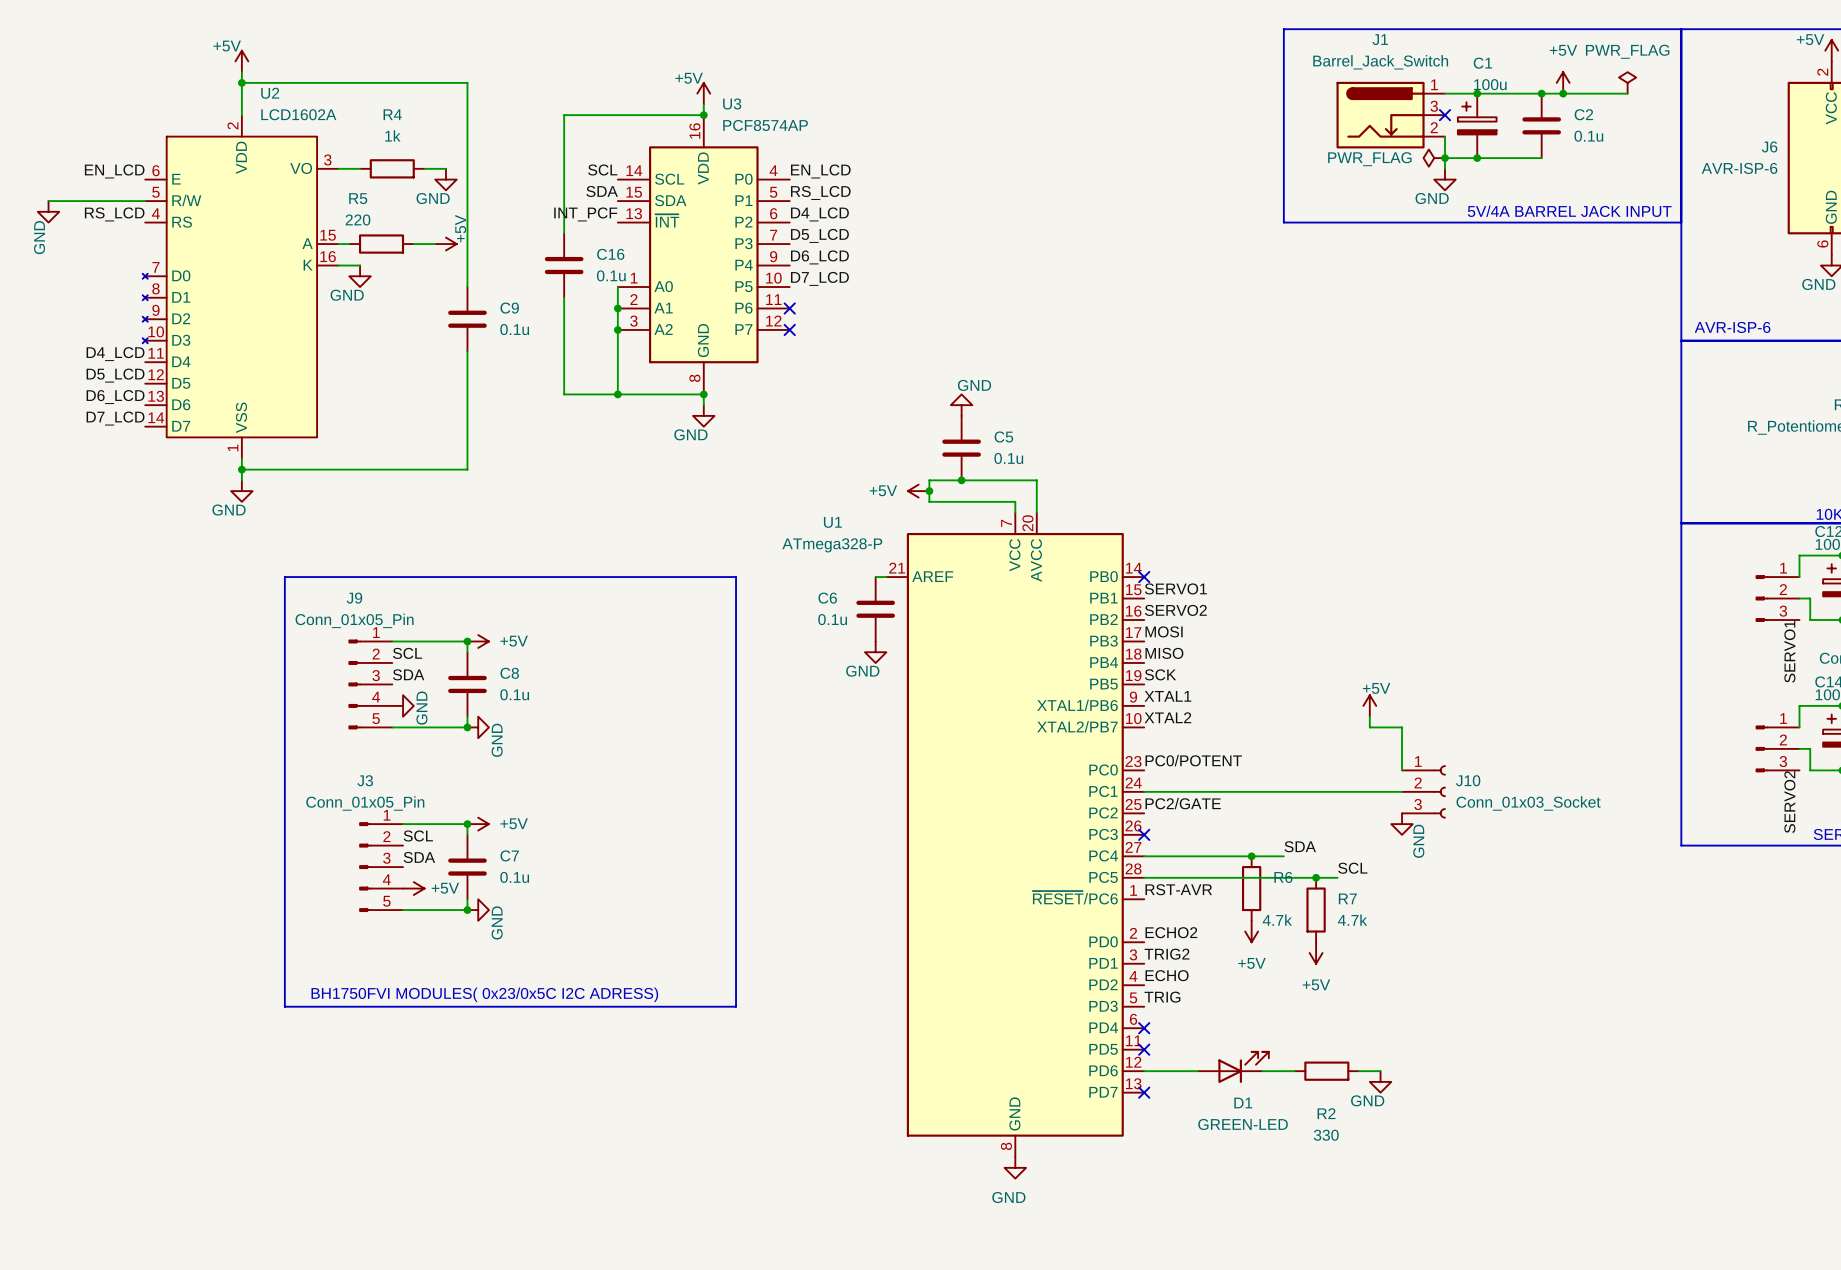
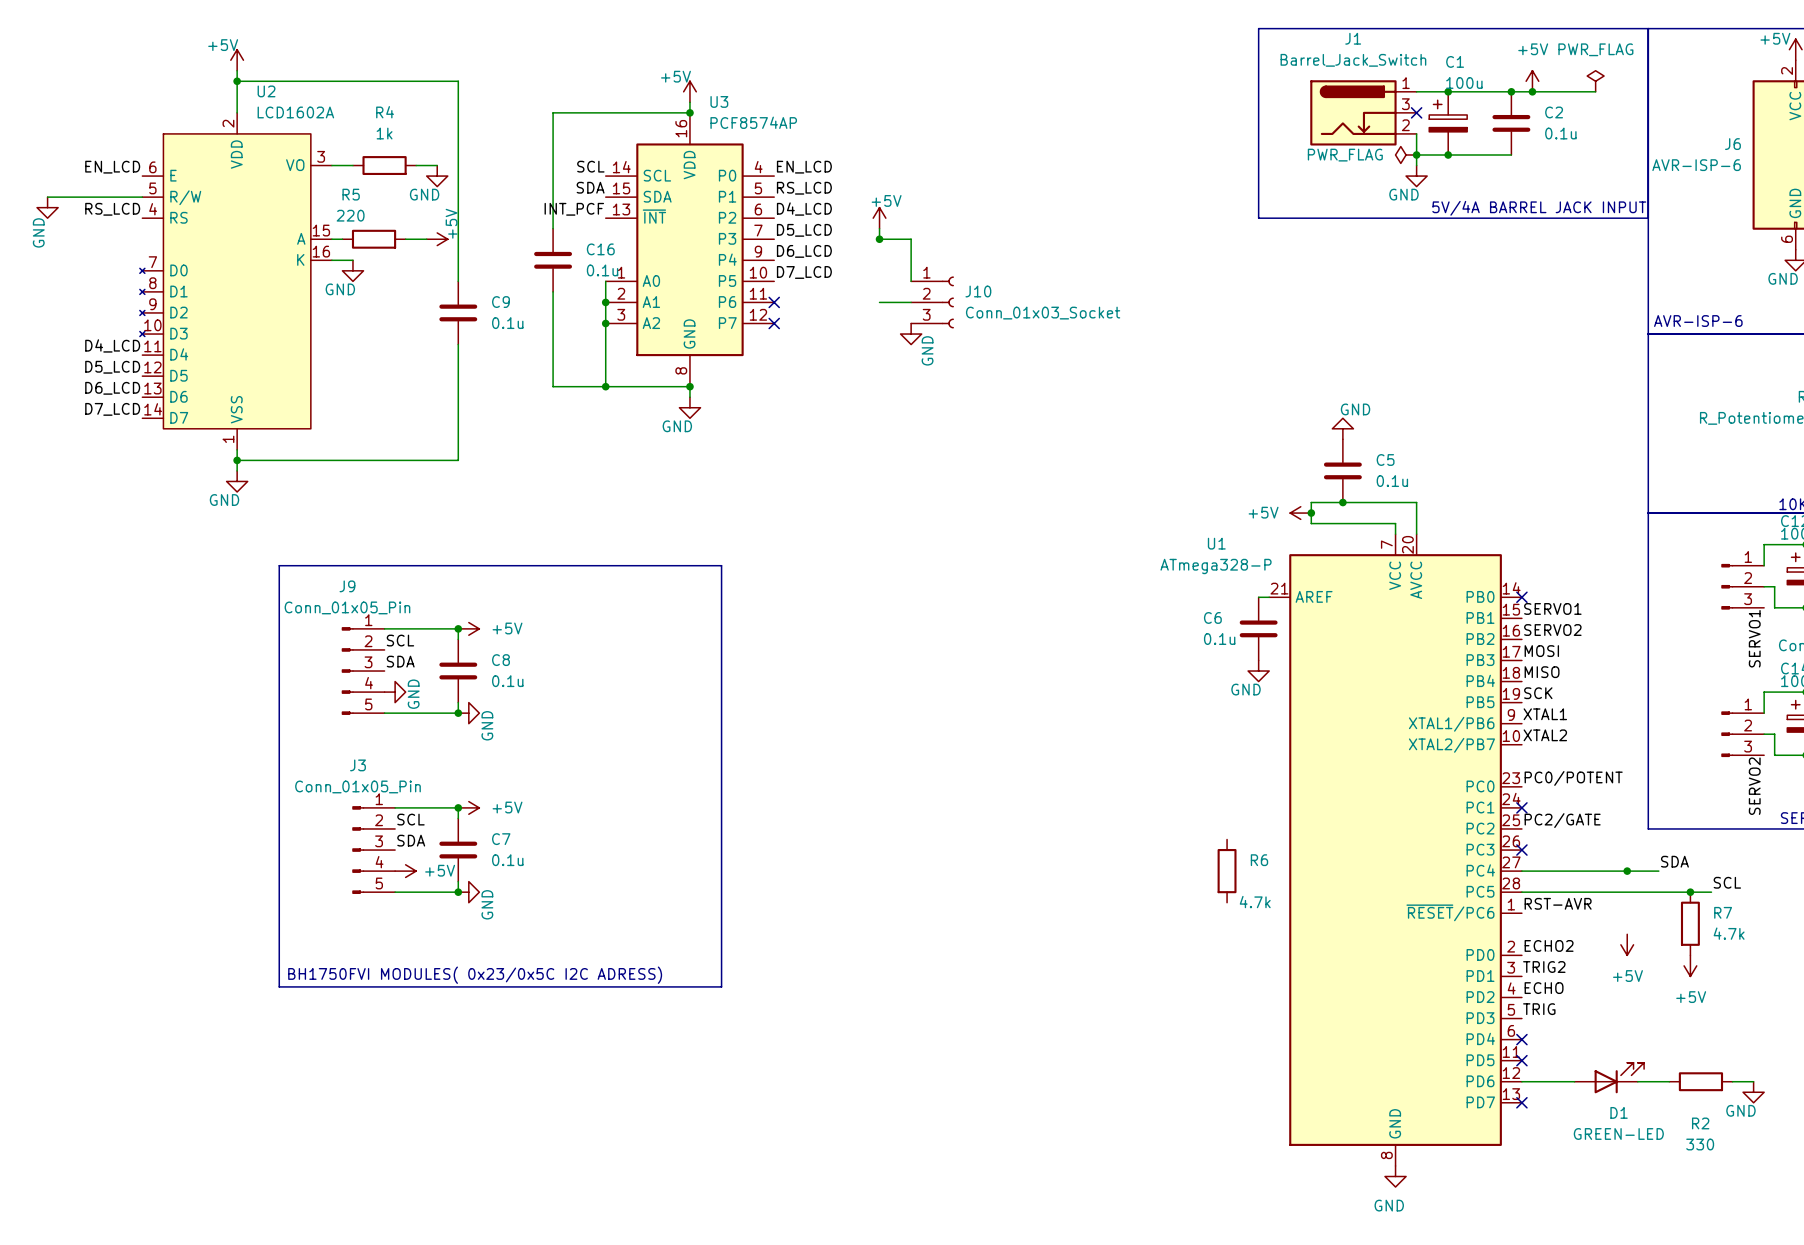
power symbol: none -> +5V (879, 218)
wire: none -> (879, 228) (879, 239) (911, 239) (911, 281)
junction: none -> (879, 239)
wire: none -> (879, 302) (911, 302)
power symbol text position: GND (974, 385) -> GND (927, 350)
power symbol rotation: 0° (961, 405) -> 180° (911, 334)
power symbol position: GND (961, 405) -> GND (911, 334)
power symbol: none -> GND (1342, 428)
C5 position: (961, 448) -> (1342, 470)
junction: (961, 480) -> none
power symbol: +5V (918, 491) -> none
junction: (929, 491) -> none
wire: (1015, 512) (1015, 501) (929, 501) (929, 480) (1036, 480) (1036, 512) -> none
junction: none -> (1342, 502)
junction: none -> (1311, 513)
wire: none -> (1395, 534) (1395, 523) (1311, 523) (1311, 502) (1416, 502) (1416, 534)
wire: (875, 577) (886, 577) -> none
no-connect mark: (1144, 577) -> none
label: SERVO1 (1175, 588) -> none
C6 position: (875, 609) -> (1258, 628)
wire: none -> (1258, 597) (1269, 597)
no-connect mark: none -> (1521, 597)
label: SERVO2 (1175, 610) -> none
label: none -> SERVO1 (1552, 608)
label: MOSI (1164, 631) -> none
label: none -> SERVO2 (1552, 630)
power symbol: GND (875, 652) -> none
label: MISO (1164, 653) -> none
label: none -> MOSI (1541, 651)
label: SCK (1160, 674) -> none
label: none -> MISO (1542, 672)
power symbol text position: +5V (1376, 688) -> +5V (1263, 512)
label: XTAL1 (1167, 696) -> none
power symbol rotation: 0° (1369, 705) -> 90° counterclockwise (1300, 513)
power symbol position: +5V (1369, 705) -> +5V (1300, 513)
label: none -> SCK (1538, 693)
label: XTAL2 (1167, 717) -> none
label: none -> XTAL1 (1545, 714)
label: none -> XTAL2 (1545, 735)
label: PC0/POTENT (1193, 760) -> none
wire: (1144, 791) (1402, 791) -> none
J10 position: (1423, 791) -> (932, 302)
label: none -> PC0/POTENT (1573, 778)
label: PC2/GATE (1183, 803) -> none
power symbol position: GND (1402, 824) -> GND (1258, 671)
no-connect mark: none -> (1521, 807)
U1 position: (1015, 834) -> (1395, 850)
no-connect mark: (1144, 834) -> none
label: none -> PC2/GATE (1562, 820)
power symbol text rotation: 0° (1418, 841) -> 90° clockwise (1246, 689)
label: SDA (1300, 846) -> none
wire: (1144, 856) (1283, 856) -> none
junction: (1251, 856) -> none
no-connect mark: none -> (1521, 850)
label: SCL (1352, 868) -> none
wire: (1144, 877) (1337, 877) -> none
junction: (1316, 877) -> none
label: none -> SDA (1674, 861)
wire: none -> (1521, 871) (1658, 871)
junction: none -> (1627, 871)
label: RST-AVR (1178, 889) -> none
label: none -> SCL (1727, 882)
R7 position: (1316, 910) -> (1690, 923)
wire: none -> (1521, 892) (1711, 892)
junction: none -> (1690, 892)
label: none -> RST-AVR (1558, 903)
power symbol: +5V (1251, 931) -> none
label: ECHO2 (1171, 932) -> none
power symbol: +5V (1316, 953) -> none
label: TRIG2 (1166, 954) -> none
power symbol: none -> +5V (1627, 944)
label: none -> ECHO2 (1549, 945)
label: ECHO (1167, 975) -> none
power symbol: none -> +5V (1690, 965)
label: none -> TRIG2 (1544, 967)
label: TRIG (1162, 997) -> none
label: none -> ECHO (1544, 988)
no-connect mark: (1144, 1028) -> none
label: none -> TRIG (1539, 1009)
no-connect mark: (1144, 1049) -> none
no-connect mark: none -> (1521, 1039)
D1 position: (1233, 1067) -> (1609, 1078)
wire: (1144, 1071) (1197, 1071) -> none
wire: (1262, 1071) (1294, 1071) -> none
R2 position: (1326, 1071) -> (1700, 1081)
power symbol position: GND (1380, 1081) -> GND (1395, 1176)
no-connect mark: none -> (1521, 1060)
no-connect mark: (1144, 1092) -> none
power symbol text position: GND (1367, 1100) -> GND (1389, 1205)
wire: none -> (1521, 1081) (1574, 1081)
wire: none -> (1637, 1081) (1669, 1081)
wire: none -> (1732, 1081) (1753, 1081)
power symbol: none -> GND (1753, 1092)
no-connect mark: none -> (1521, 1102)
power symbol: GND (1015, 1167) -> none

